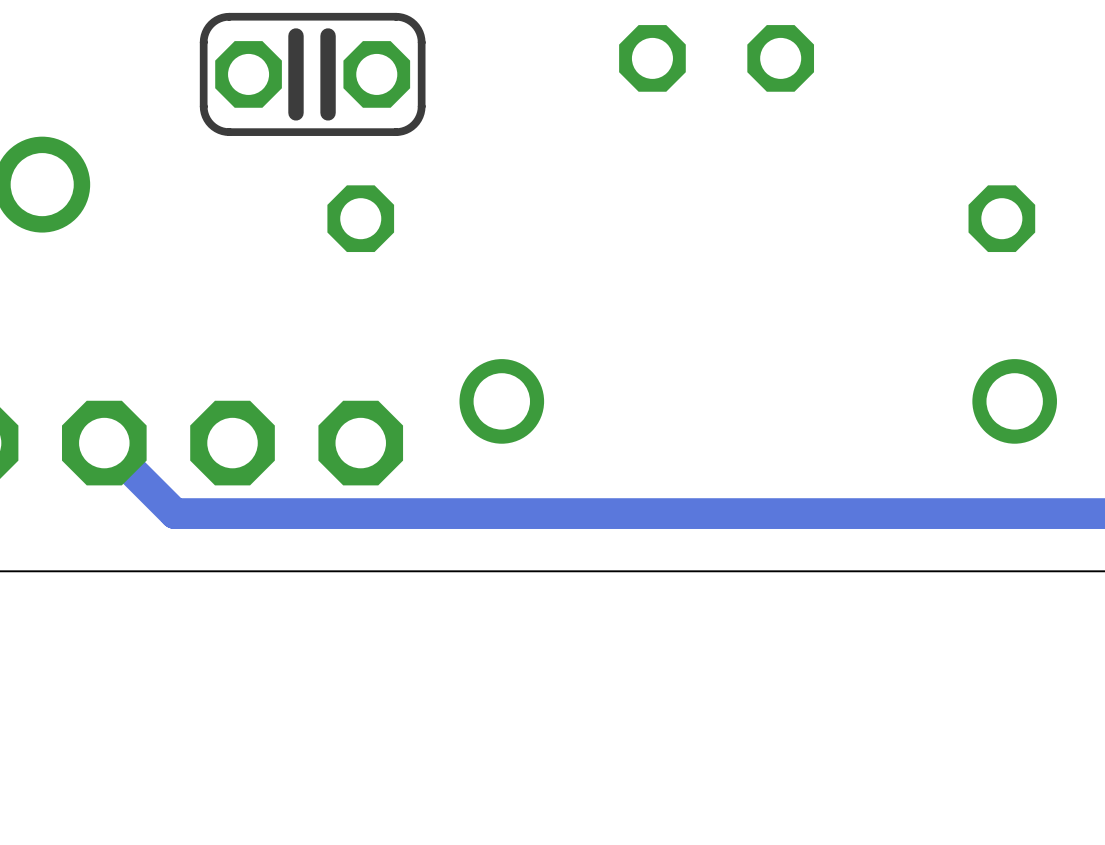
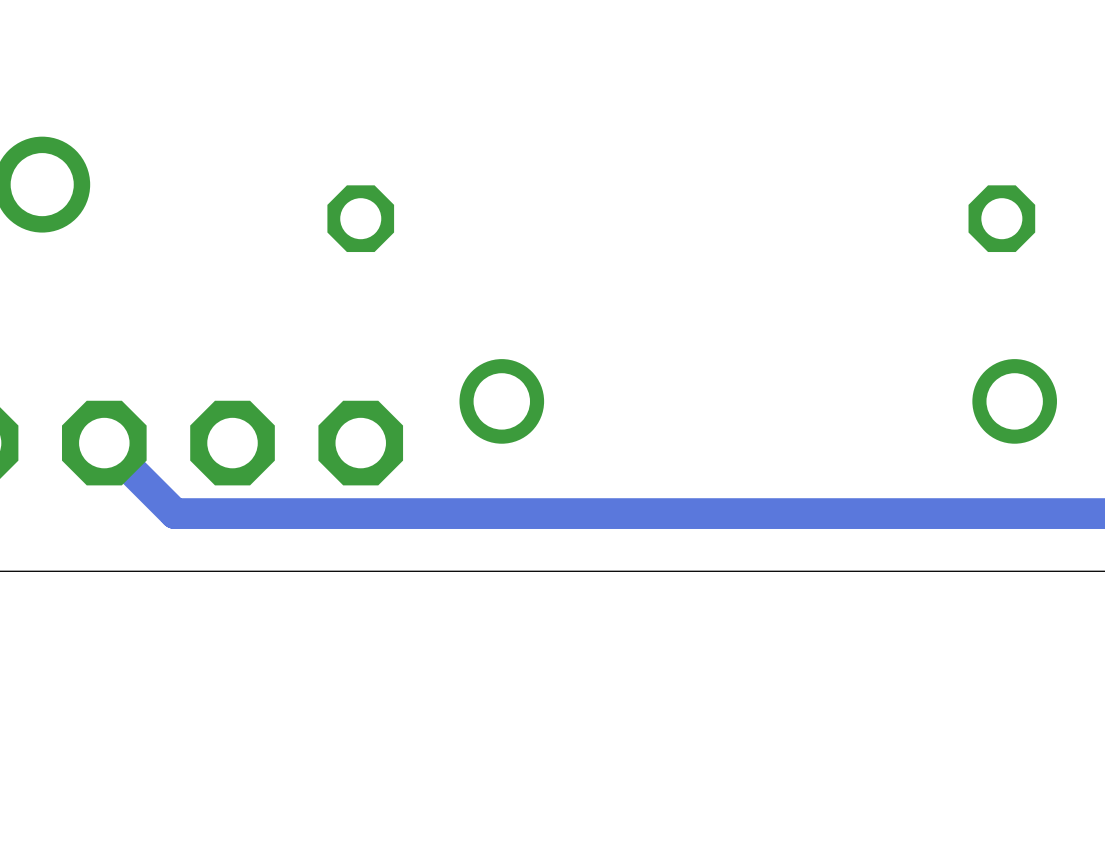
part: (716, 58) -> none
part: (312, 74) -> none

